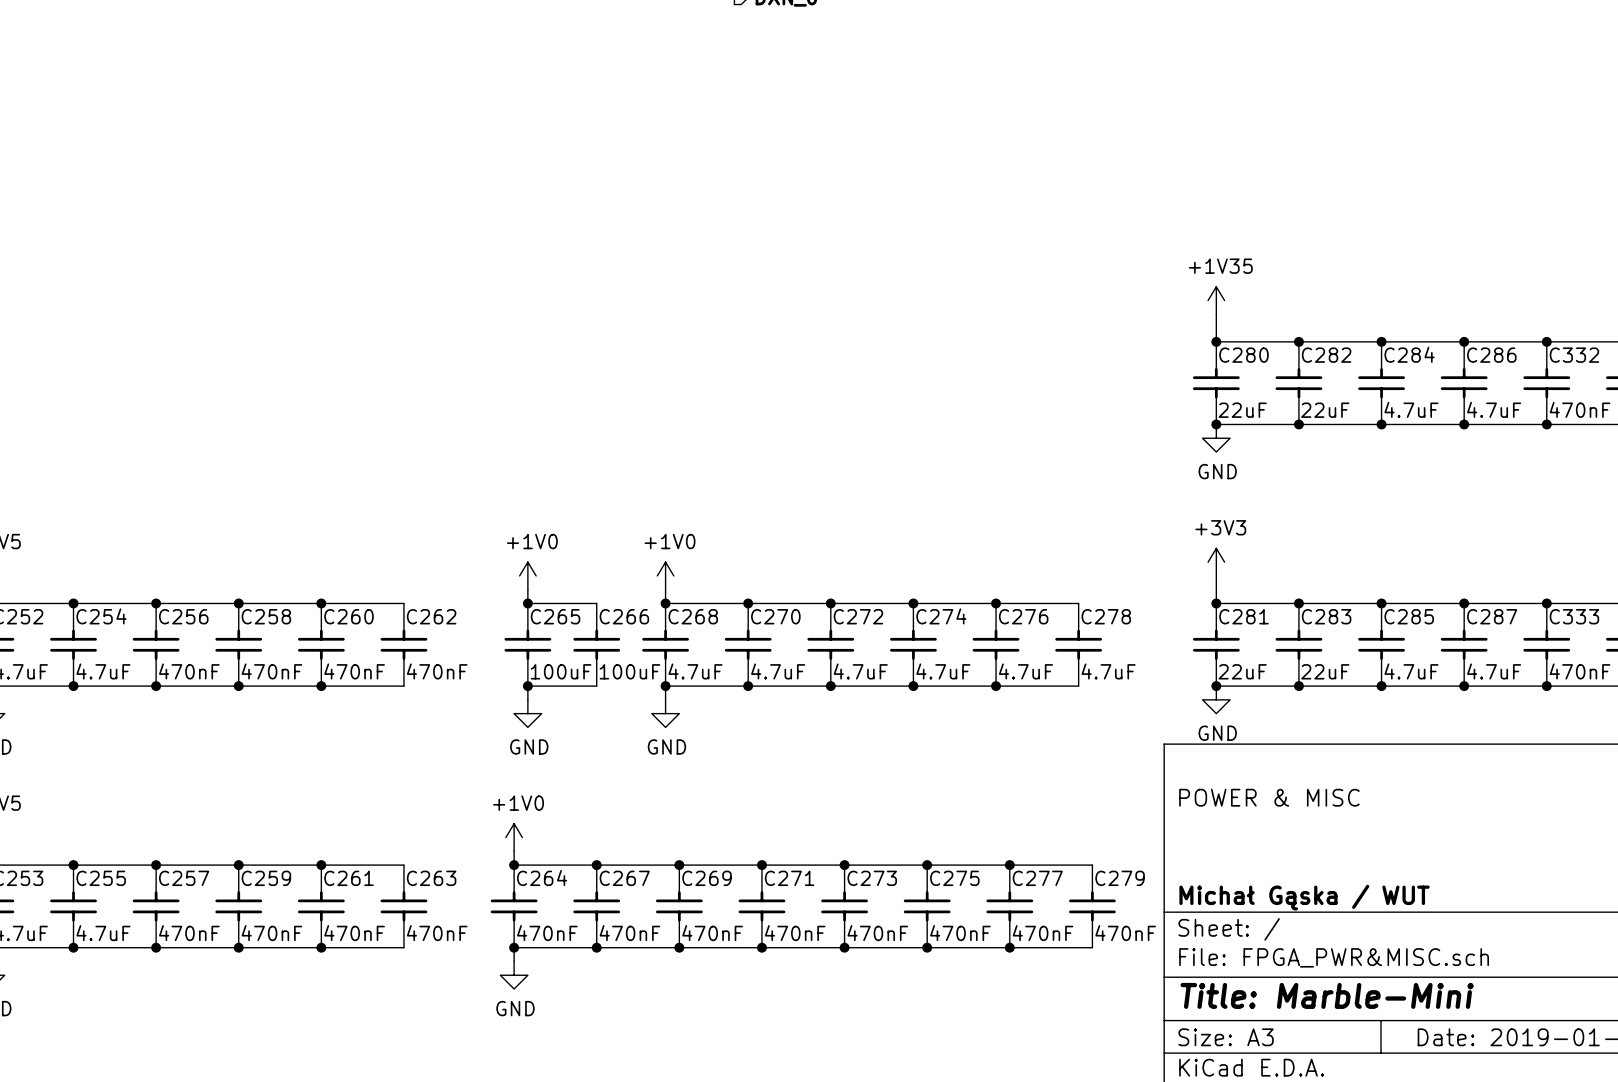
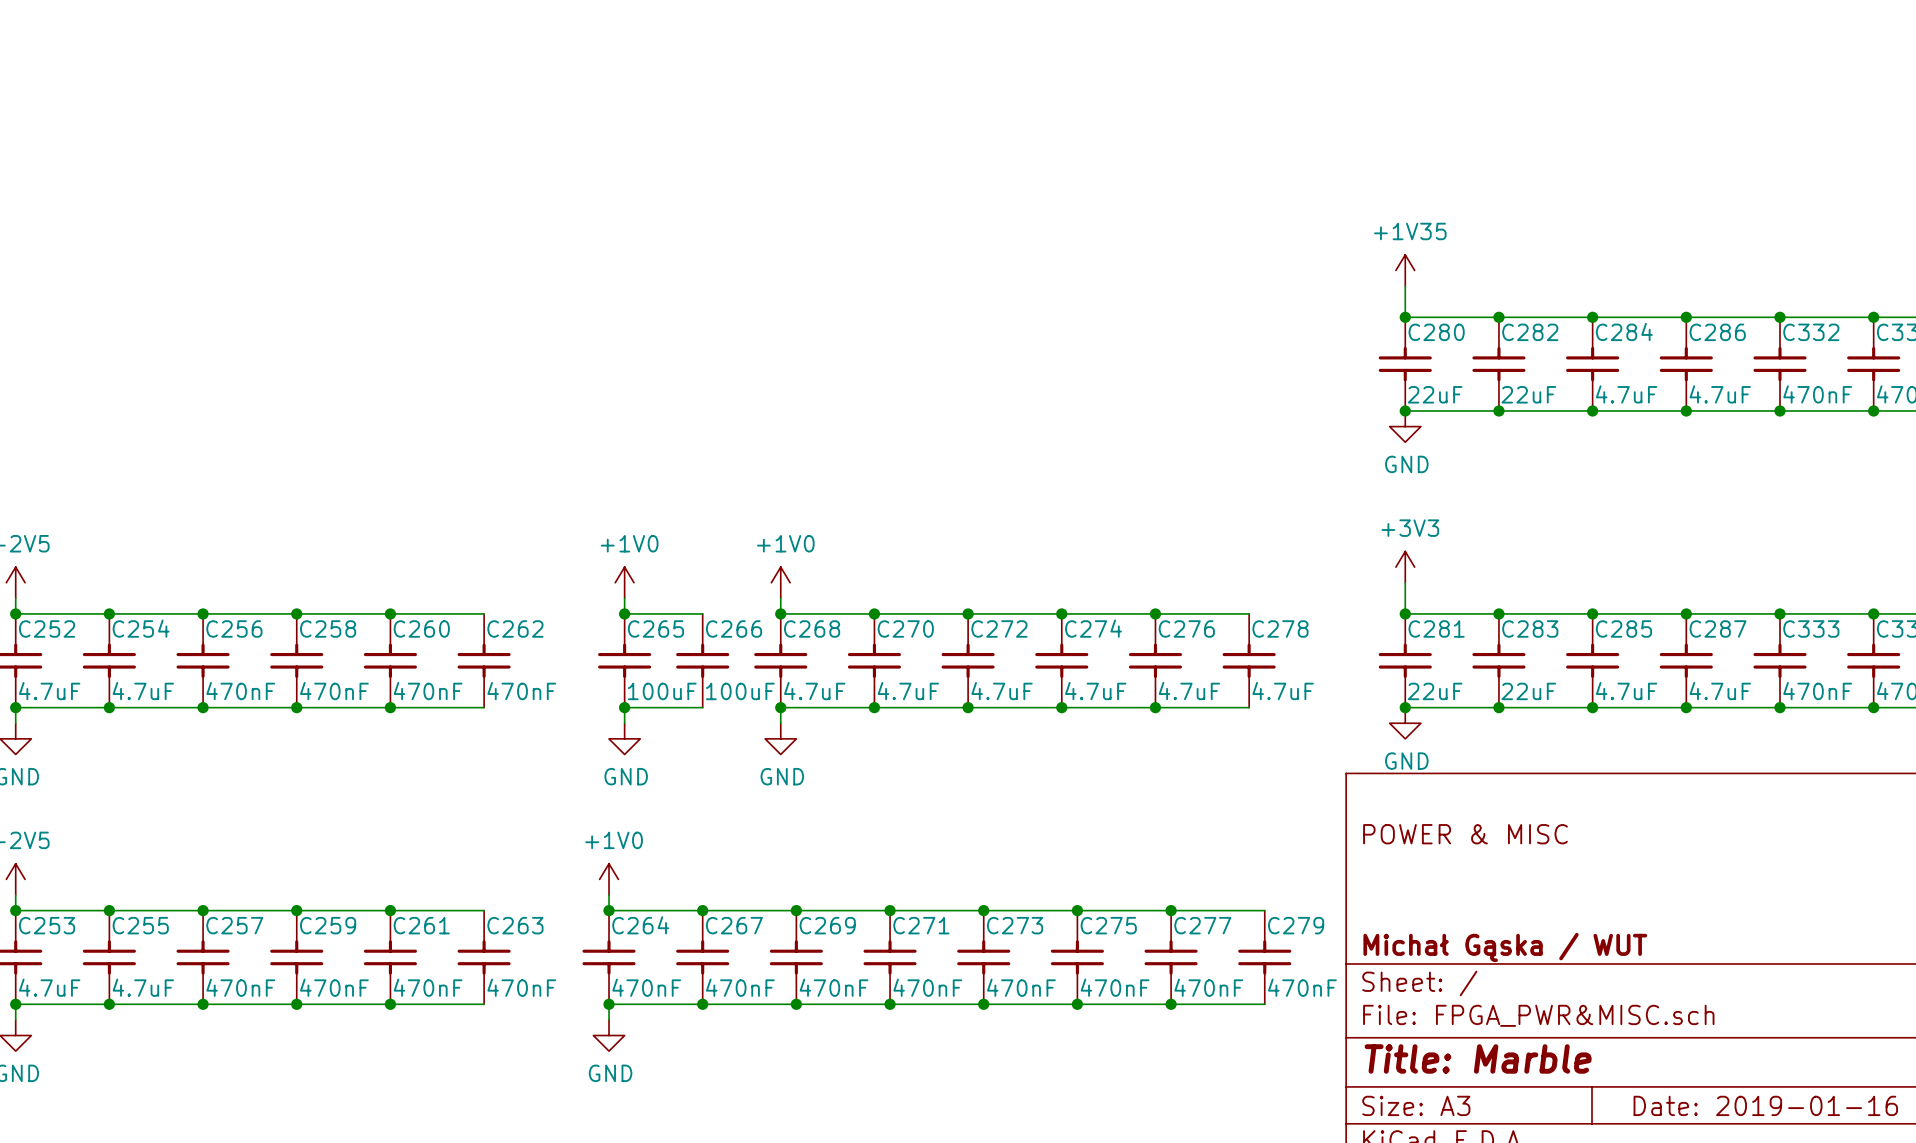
title block: Title: Marble-Mini (1327, 995) -> Title: Marble (1478, 1058)

